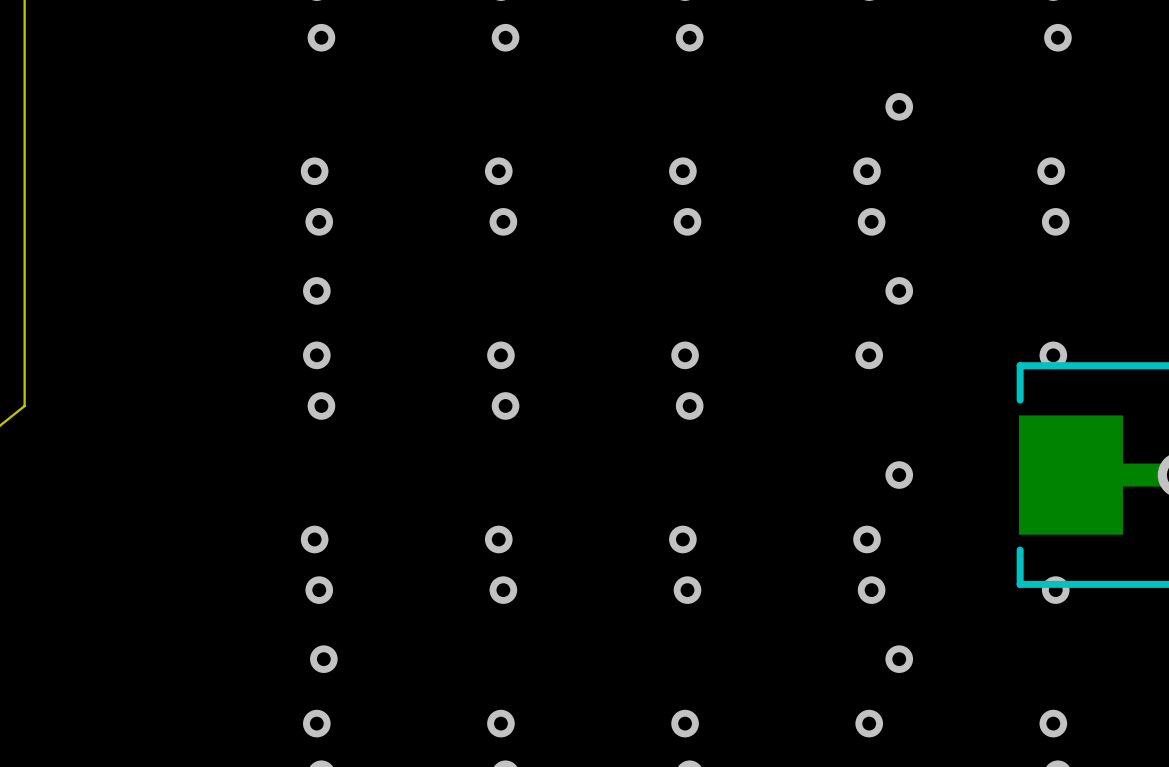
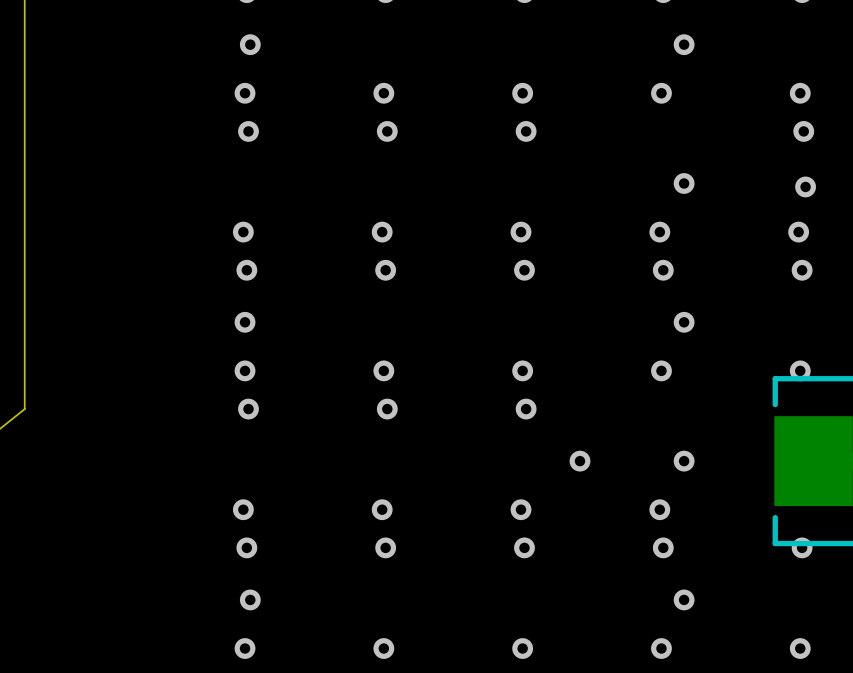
via: none -> (805, 186)
via: none -> (580, 461)

